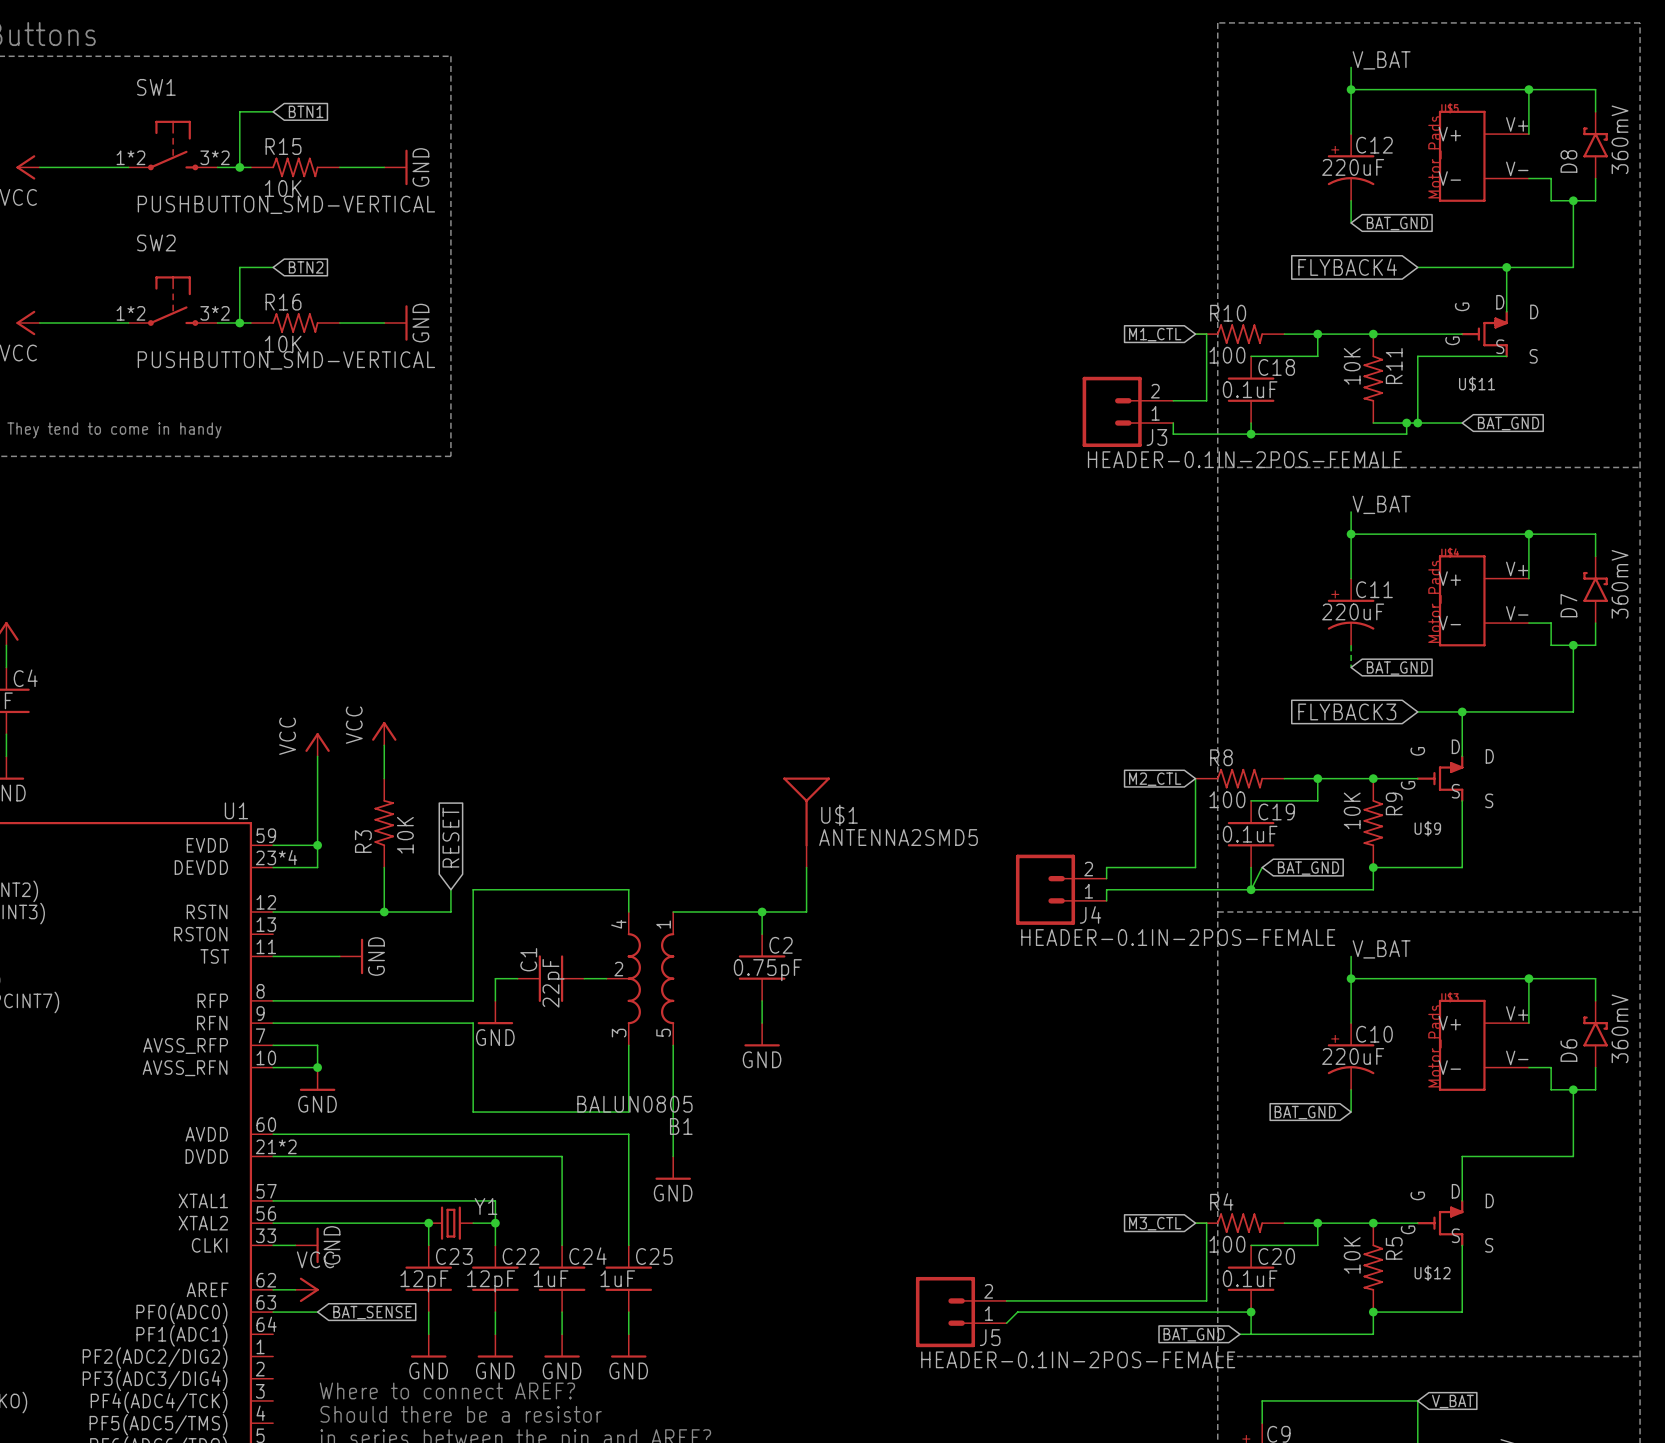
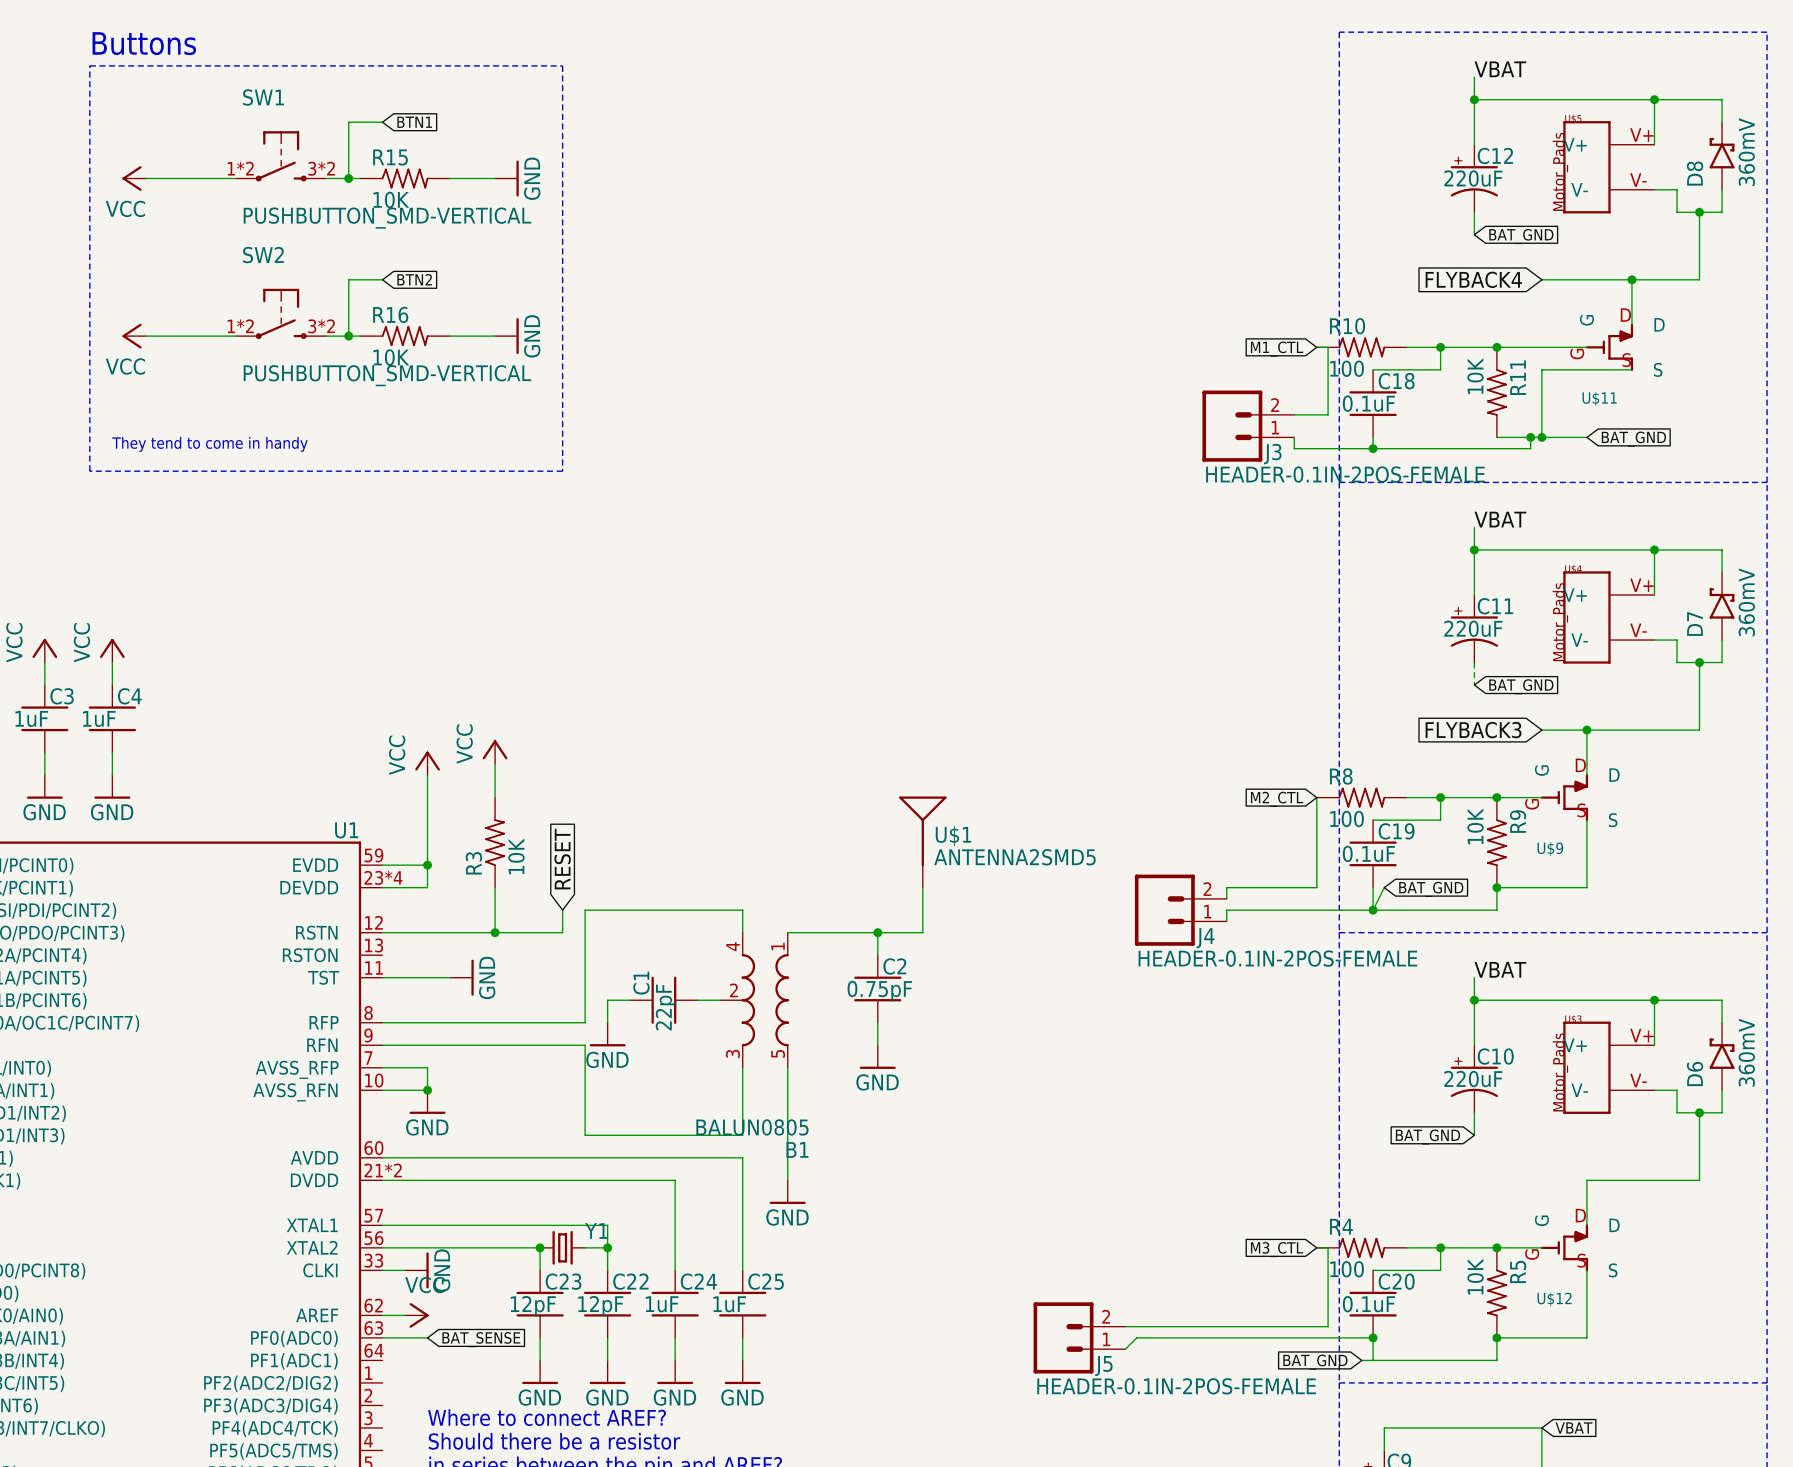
label: V_BAT (1381, 60) -> VBAT (1500, 69)
label: V_BAT (1381, 504) -> VBAT (1500, 519)
label: V_BAT (1381, 949) -> VBAT (1500, 969)
global label: V_BAT (1452, 1401) -> VBAT (1574, 1427)

